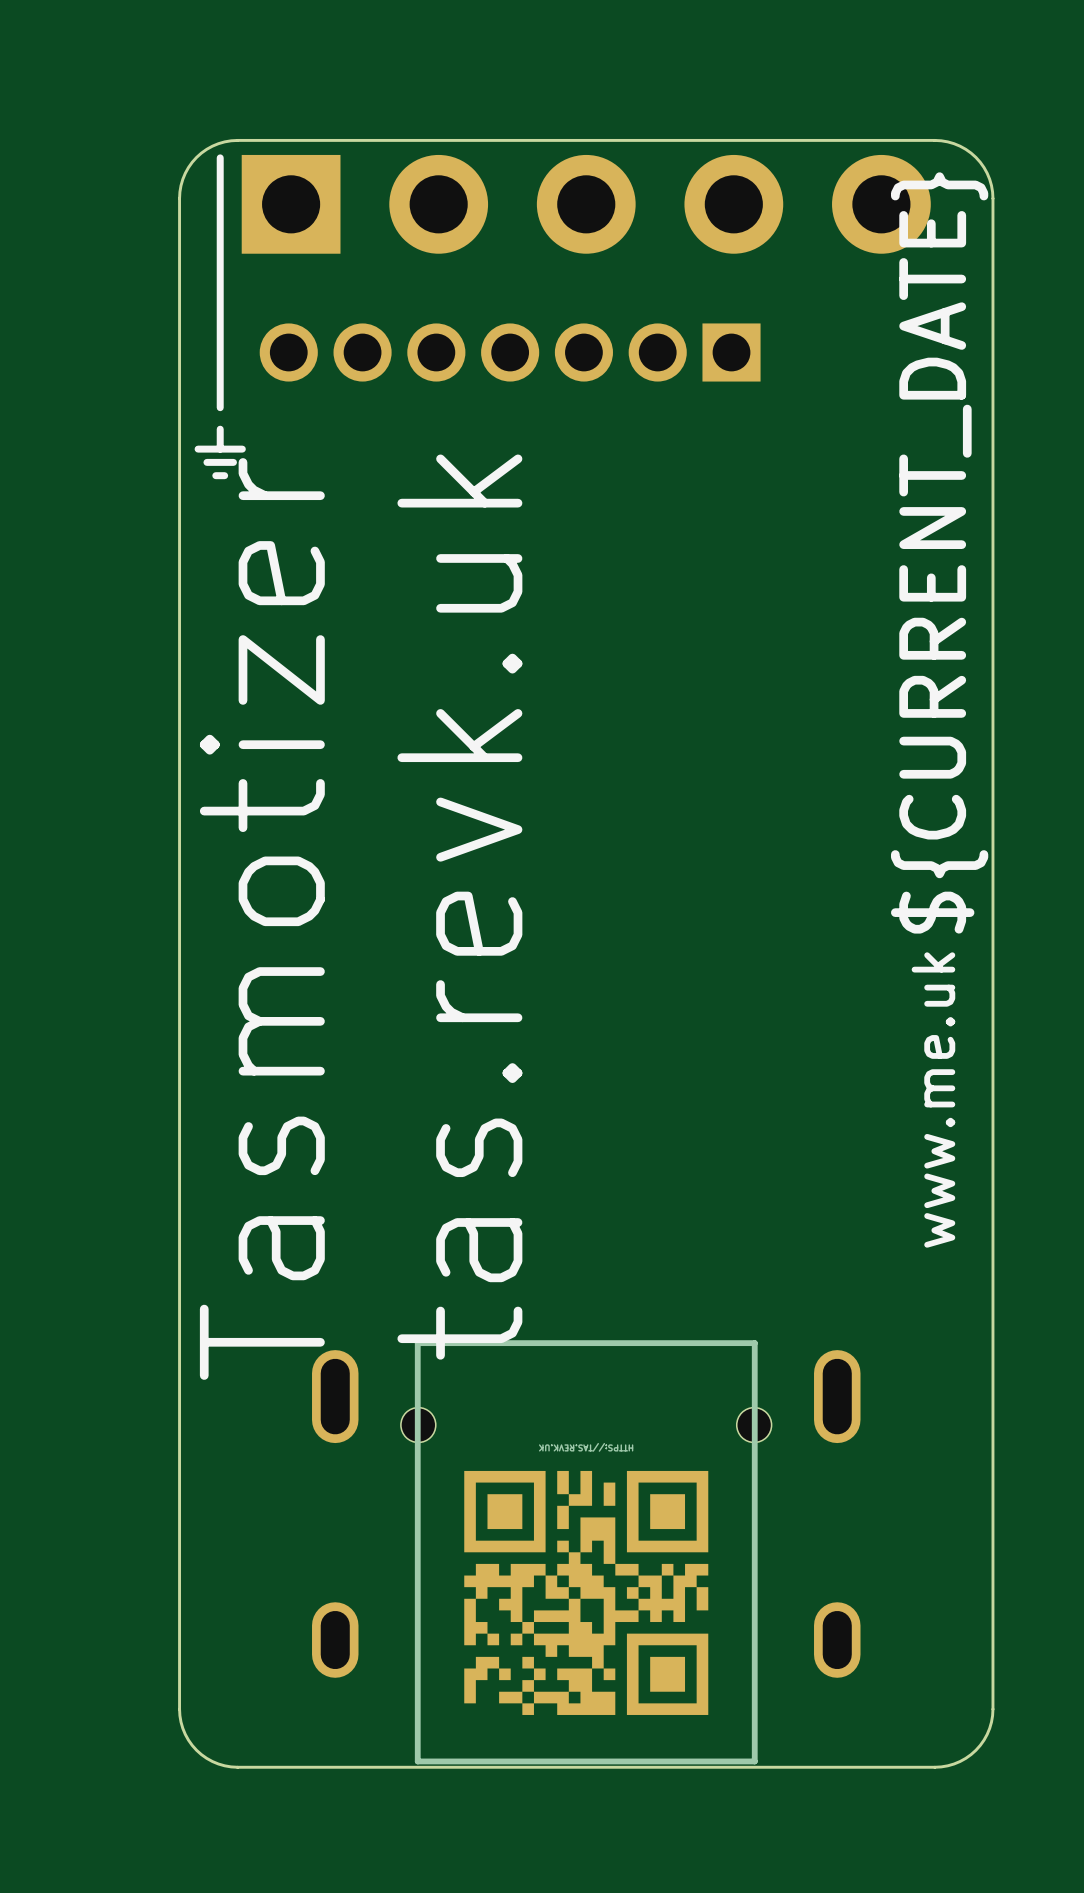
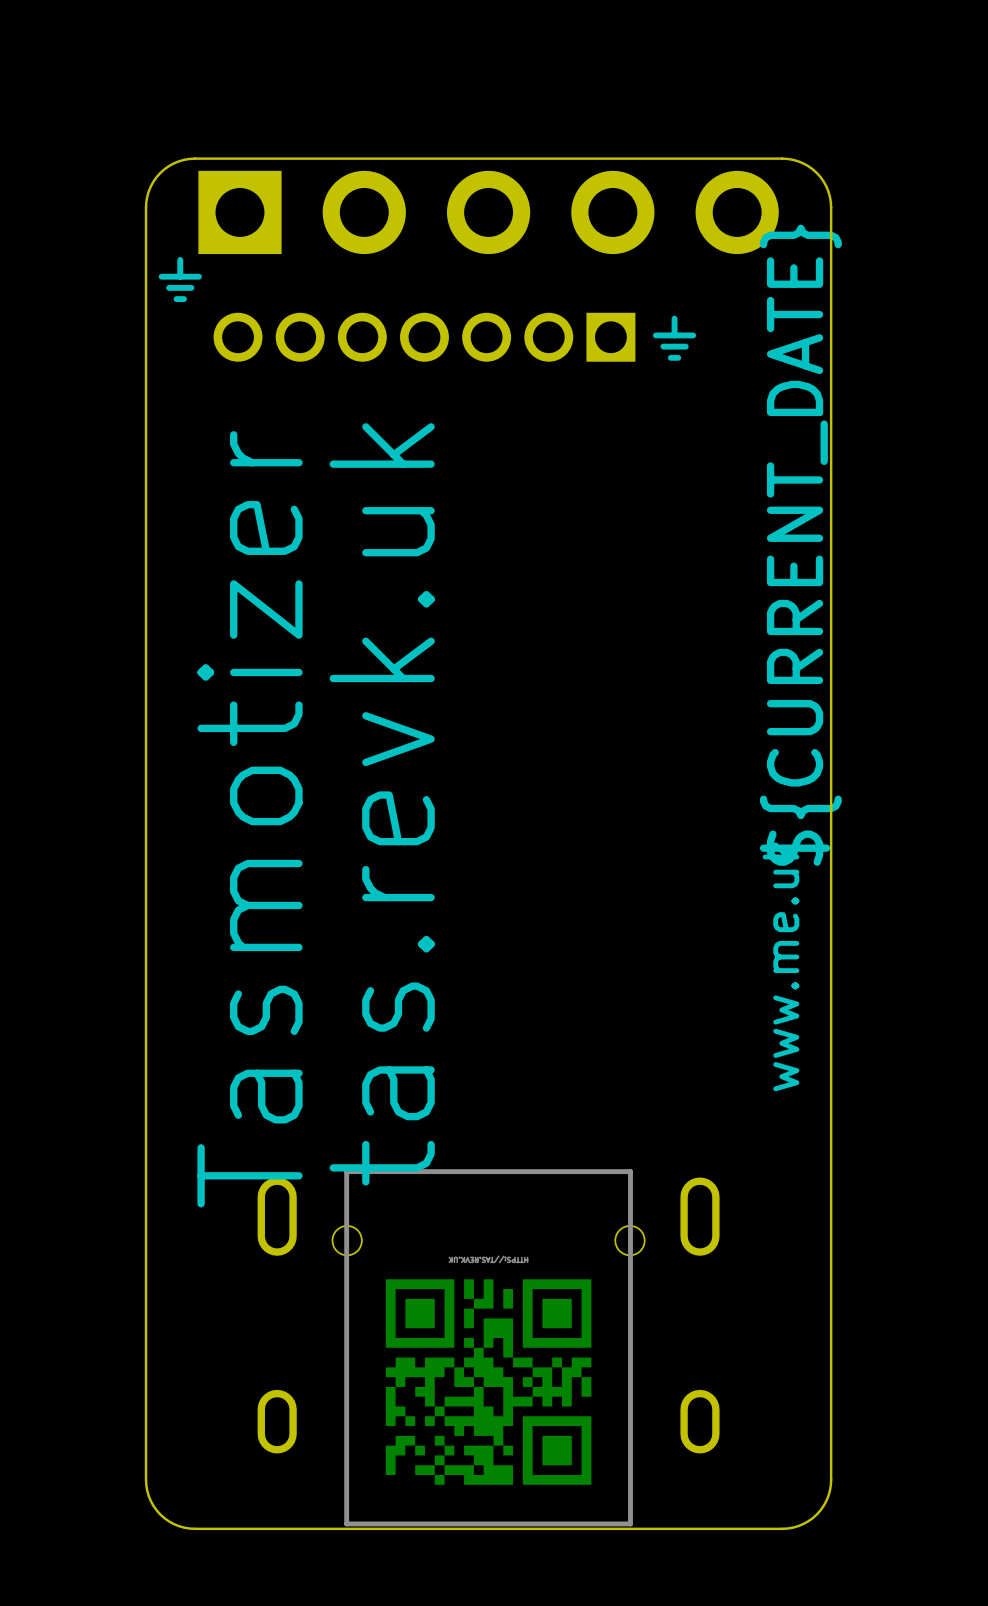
line: (220, 157) (220, 407) -> none
text: none -> ⏚ (674, 338)
text position: ⏚ (220, 452) -> ⏚ (180, 279)
text position: ${CURRENT_DATE} (939, 552) -> ${CURRENT_DATE} (800, 545)
text position: Tasmotizer (262, 918) -> Tasmotizer (250, 819)

